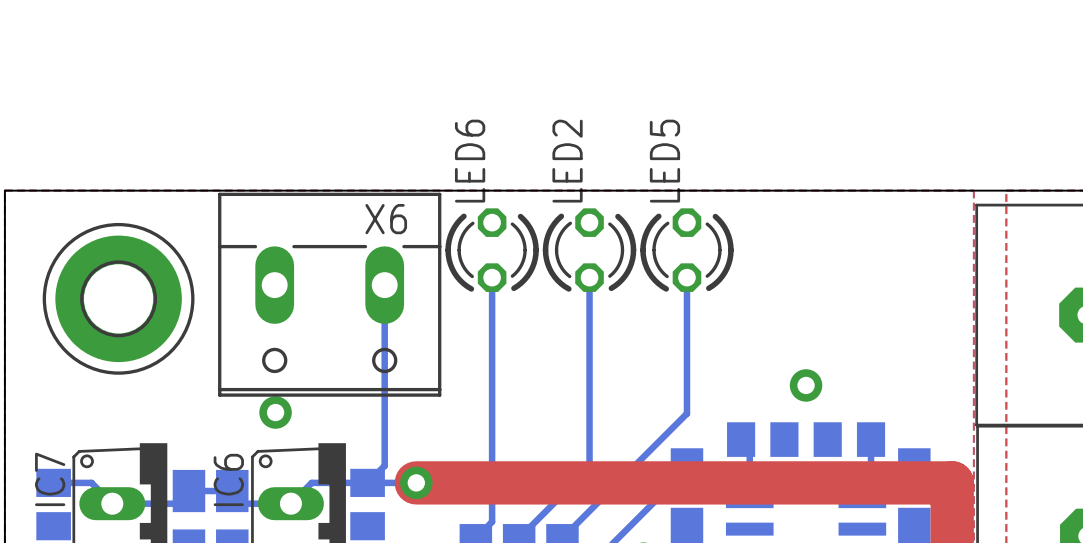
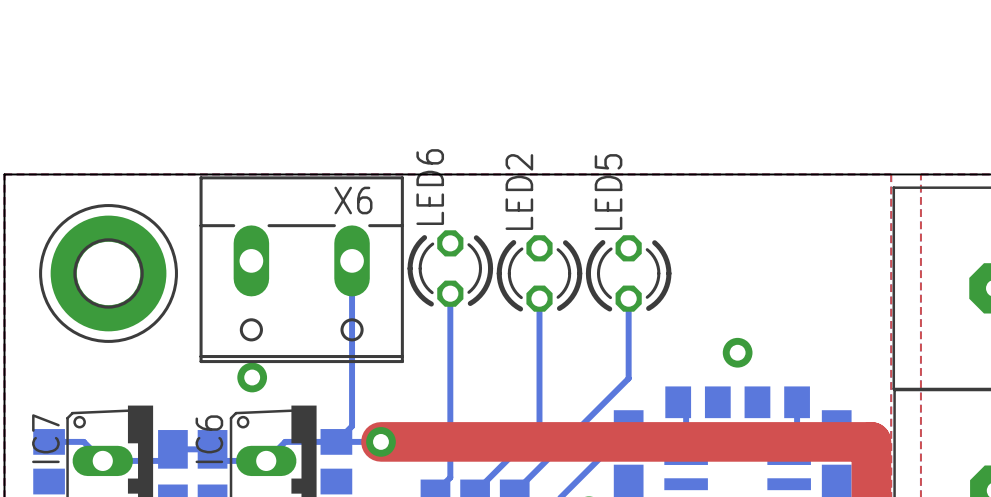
LED6 position: (492, 250) -> (450, 268)
LED2 position: (589, 250) -> (539, 273)
LED5 position: (686, 250) -> (628, 273)
bottom track: (492, 277) (492, 320) -> none
bottom track: (589, 277) (589, 326) -> none
bottom track: (686, 277) (686, 326) -> none

